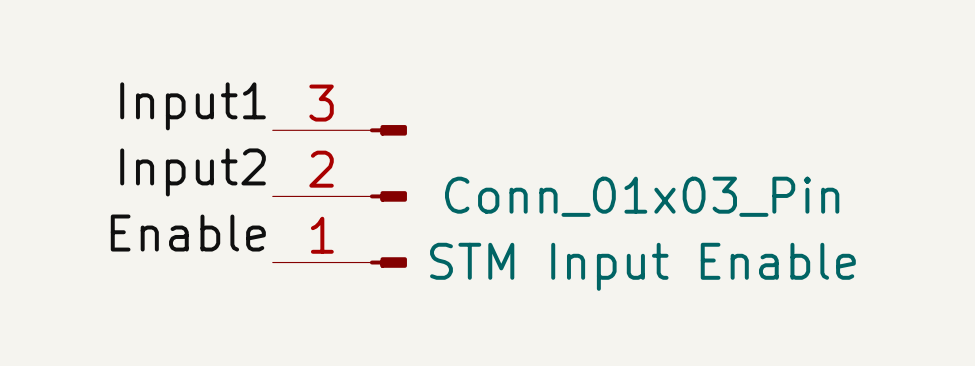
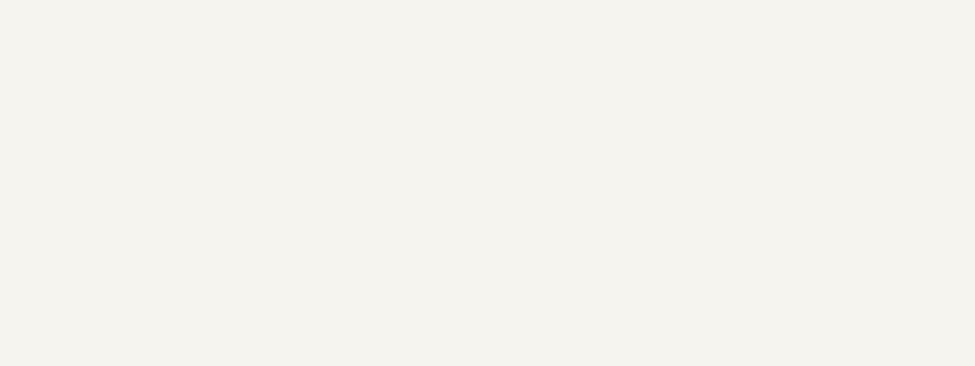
label: Input1 (193, 106) -> none
label: Input2 (193, 172) -> none
STM Input Enable: Conn_01x03_Pin (339, 196) -> none
label: Enable (188, 233) -> none

